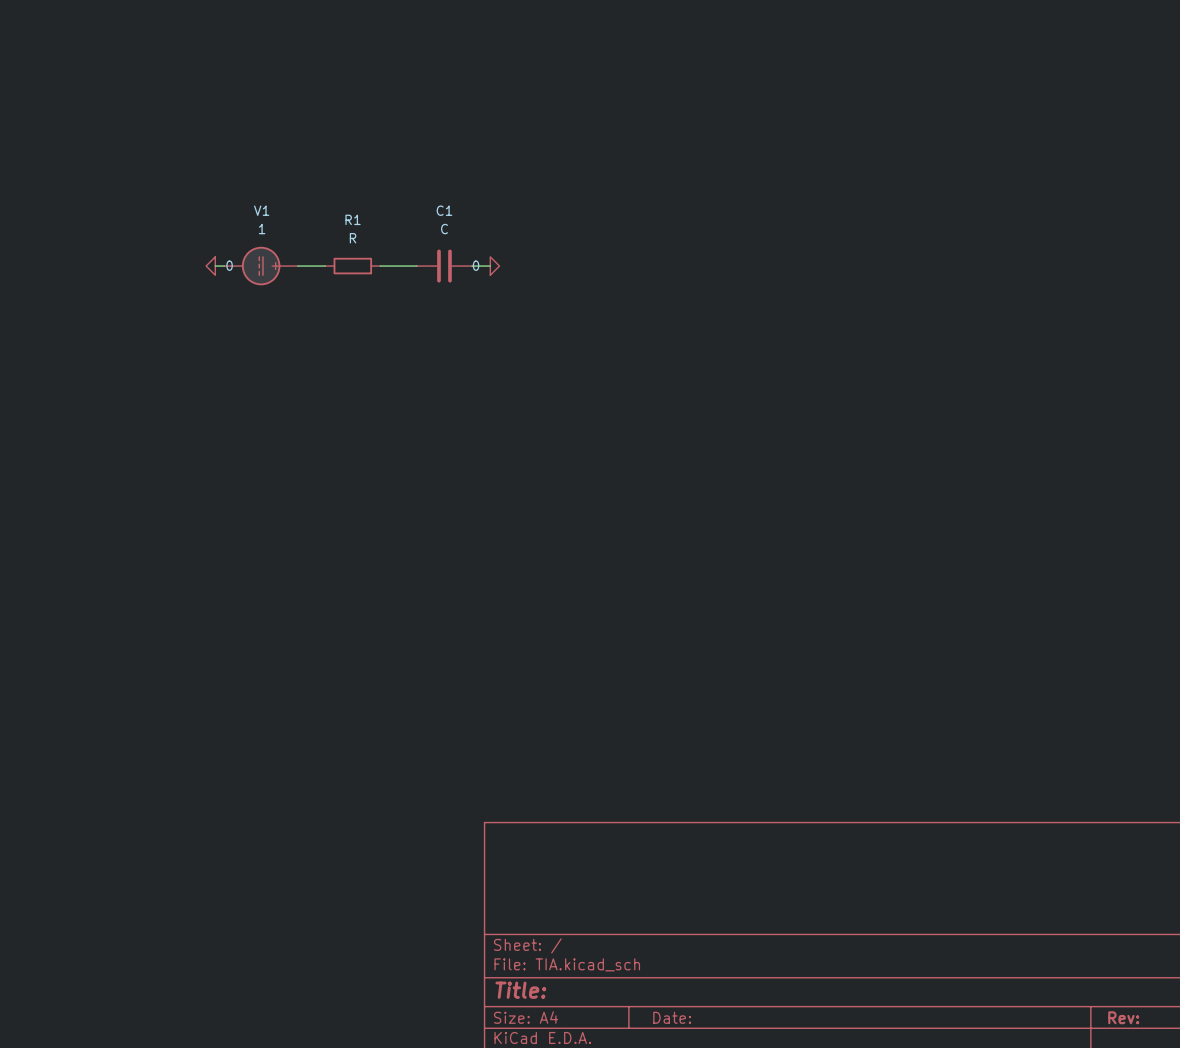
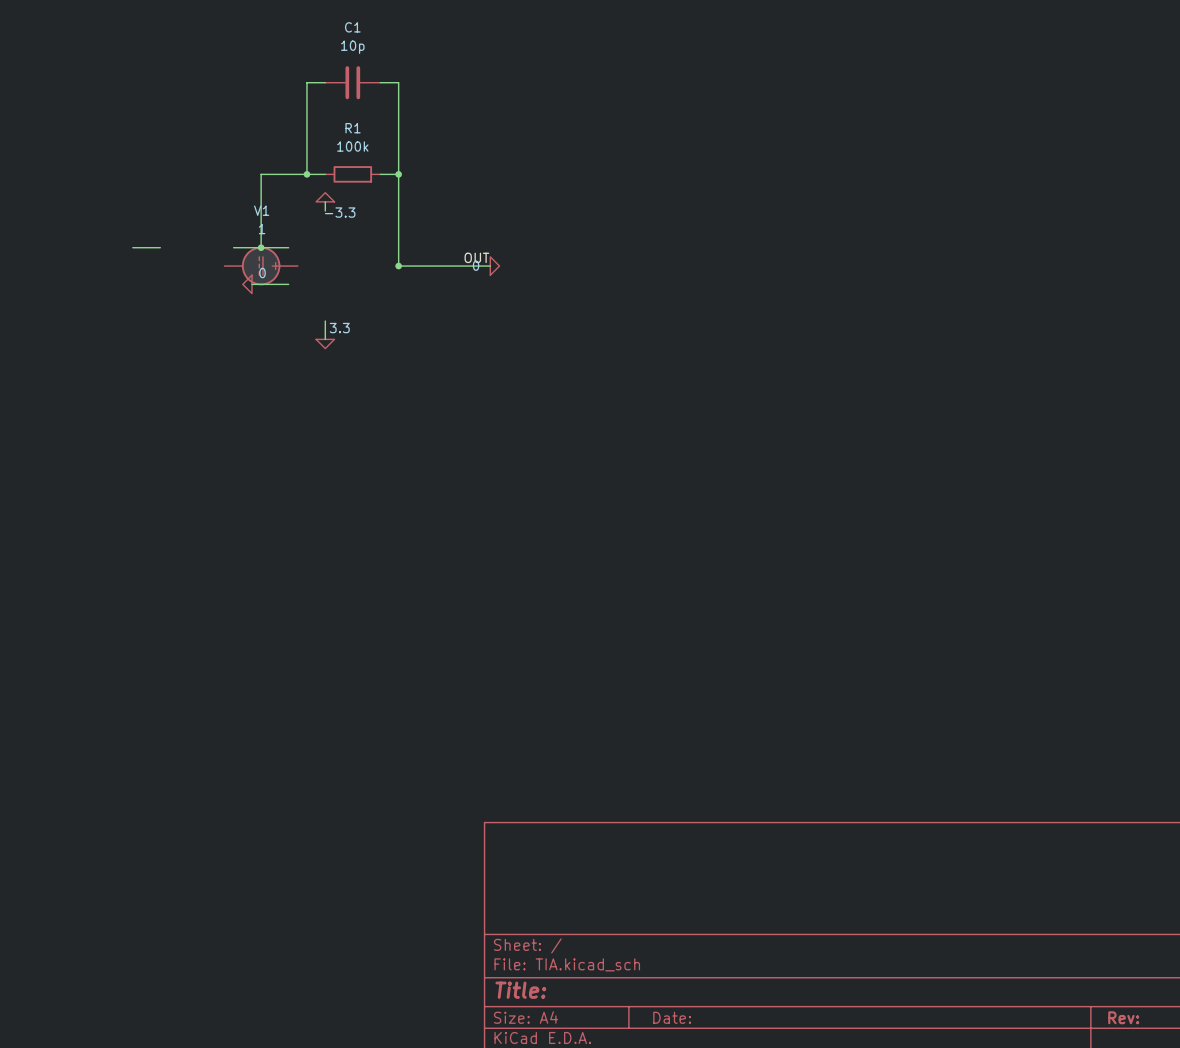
wire: none -> (325, 82) (306, 82) (306, 174)
junction: none -> (306, 174)
wire: none -> (325, 174) (261, 174) (261, 247)
wire: none -> (380, 174) (398, 174)
junction: none -> (398, 174)
power symbol: none -> -3.3 (325, 197)
wire: none -> (325, 201) (325, 211)
C1 value: C (444, 229) -> 10p (352, 47)
R1 value: R (353, 238) -> 100k (352, 146)
wire: none -> (233, 247) (288, 247)
junction: none -> (261, 247)
label: none -> OUT (476, 257)
power symbol text position: 0 (229, 265) -> 0 (262, 273)
power symbol position: 0 (210, 266) -> 0 (247, 284)
wire: (215, 266) (224, 266) -> none
wire: (297, 266) (325, 266) -> (132, 247) (160, 247)
R1 position: (352, 266) -> (352, 174)
wire: (380, 266) (398, 266) -> (380, 82) (398, 82) (398, 266)
junction: none -> (398, 266)
C1 position: (444, 266) -> (352, 82)
wire: none -> (251, 284) (288, 284)
wire: none -> (325, 321) (325, 339)
power symbol: none -> 3.3 (325, 343)

